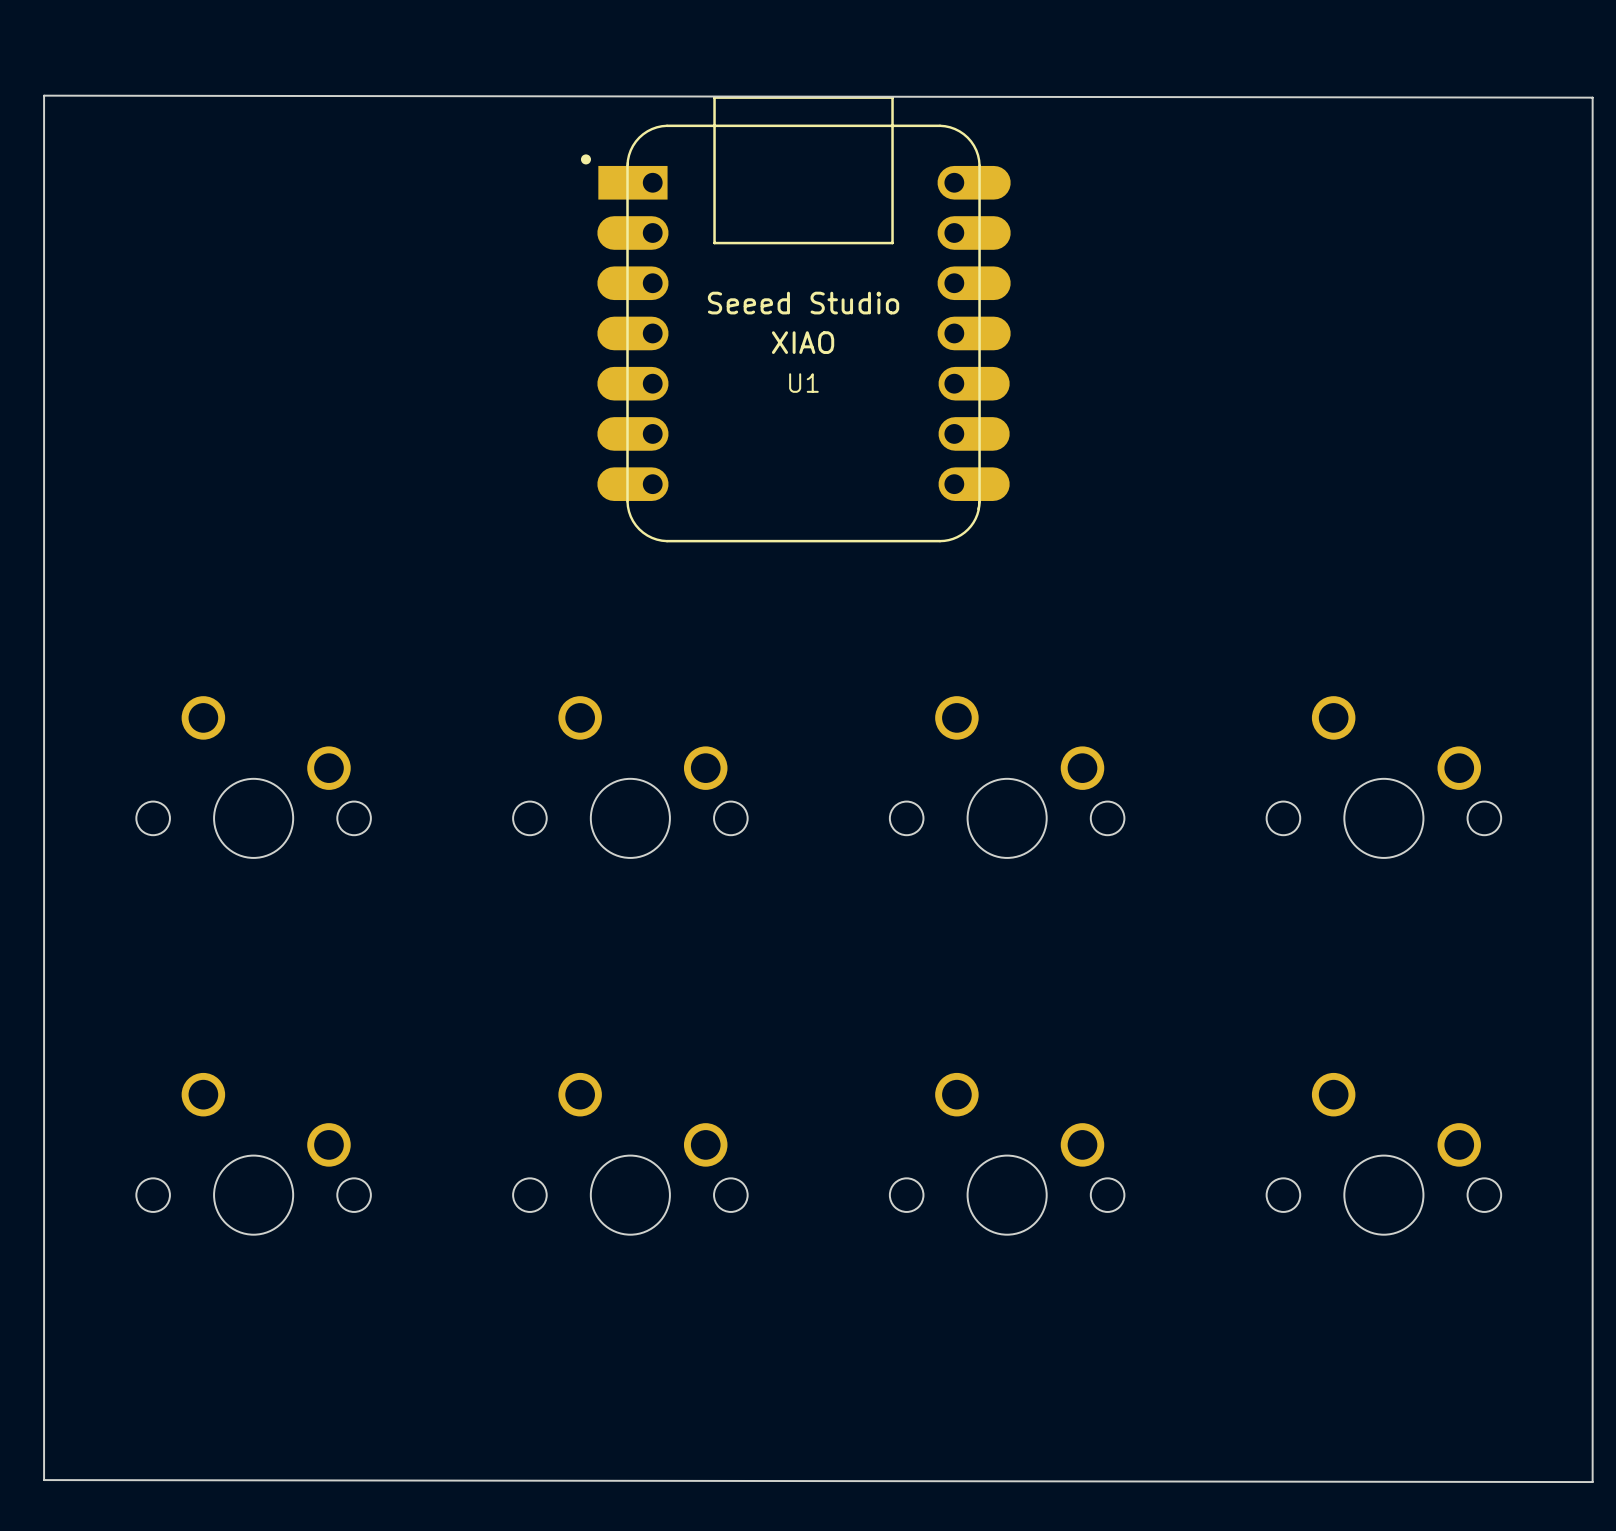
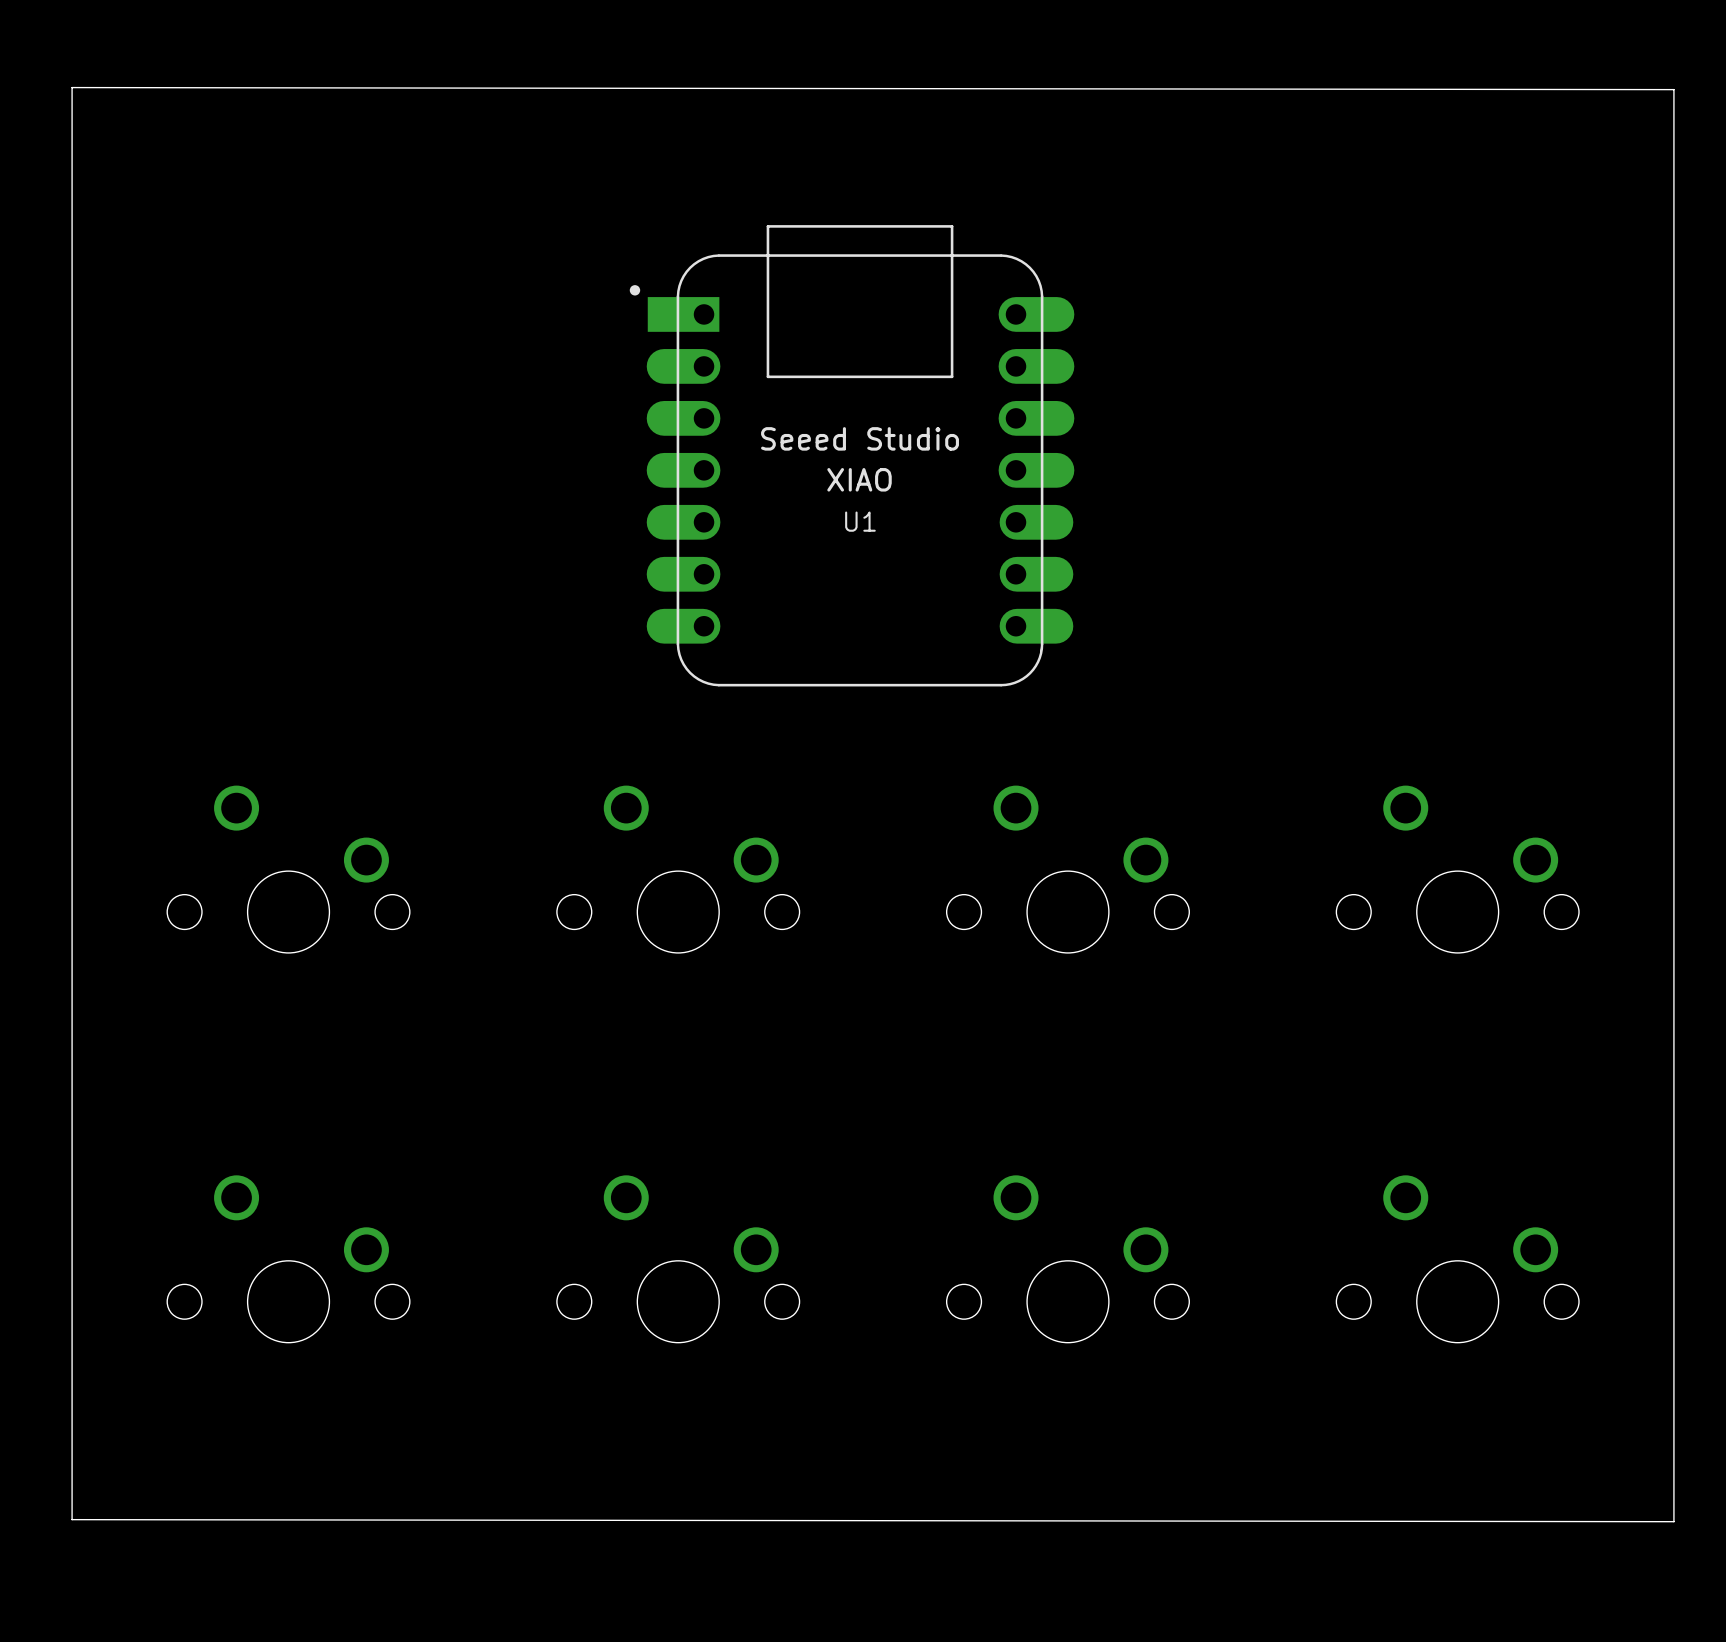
board edge: (44, 95) (1592, 97) (1592, 1482) (44, 1480) (44, 95) -> (72, 87) (1673, 89) (1673, 1521) (72, 1519) (72, 87)
U1 position: (795, 319) -> (852, 455)

